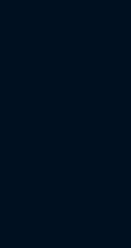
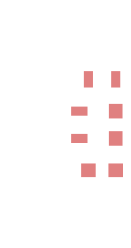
part: none -> (102, 79)
part: none -> (79, 124)
part: none -> (115, 124)
part: none -> (102, 170)

